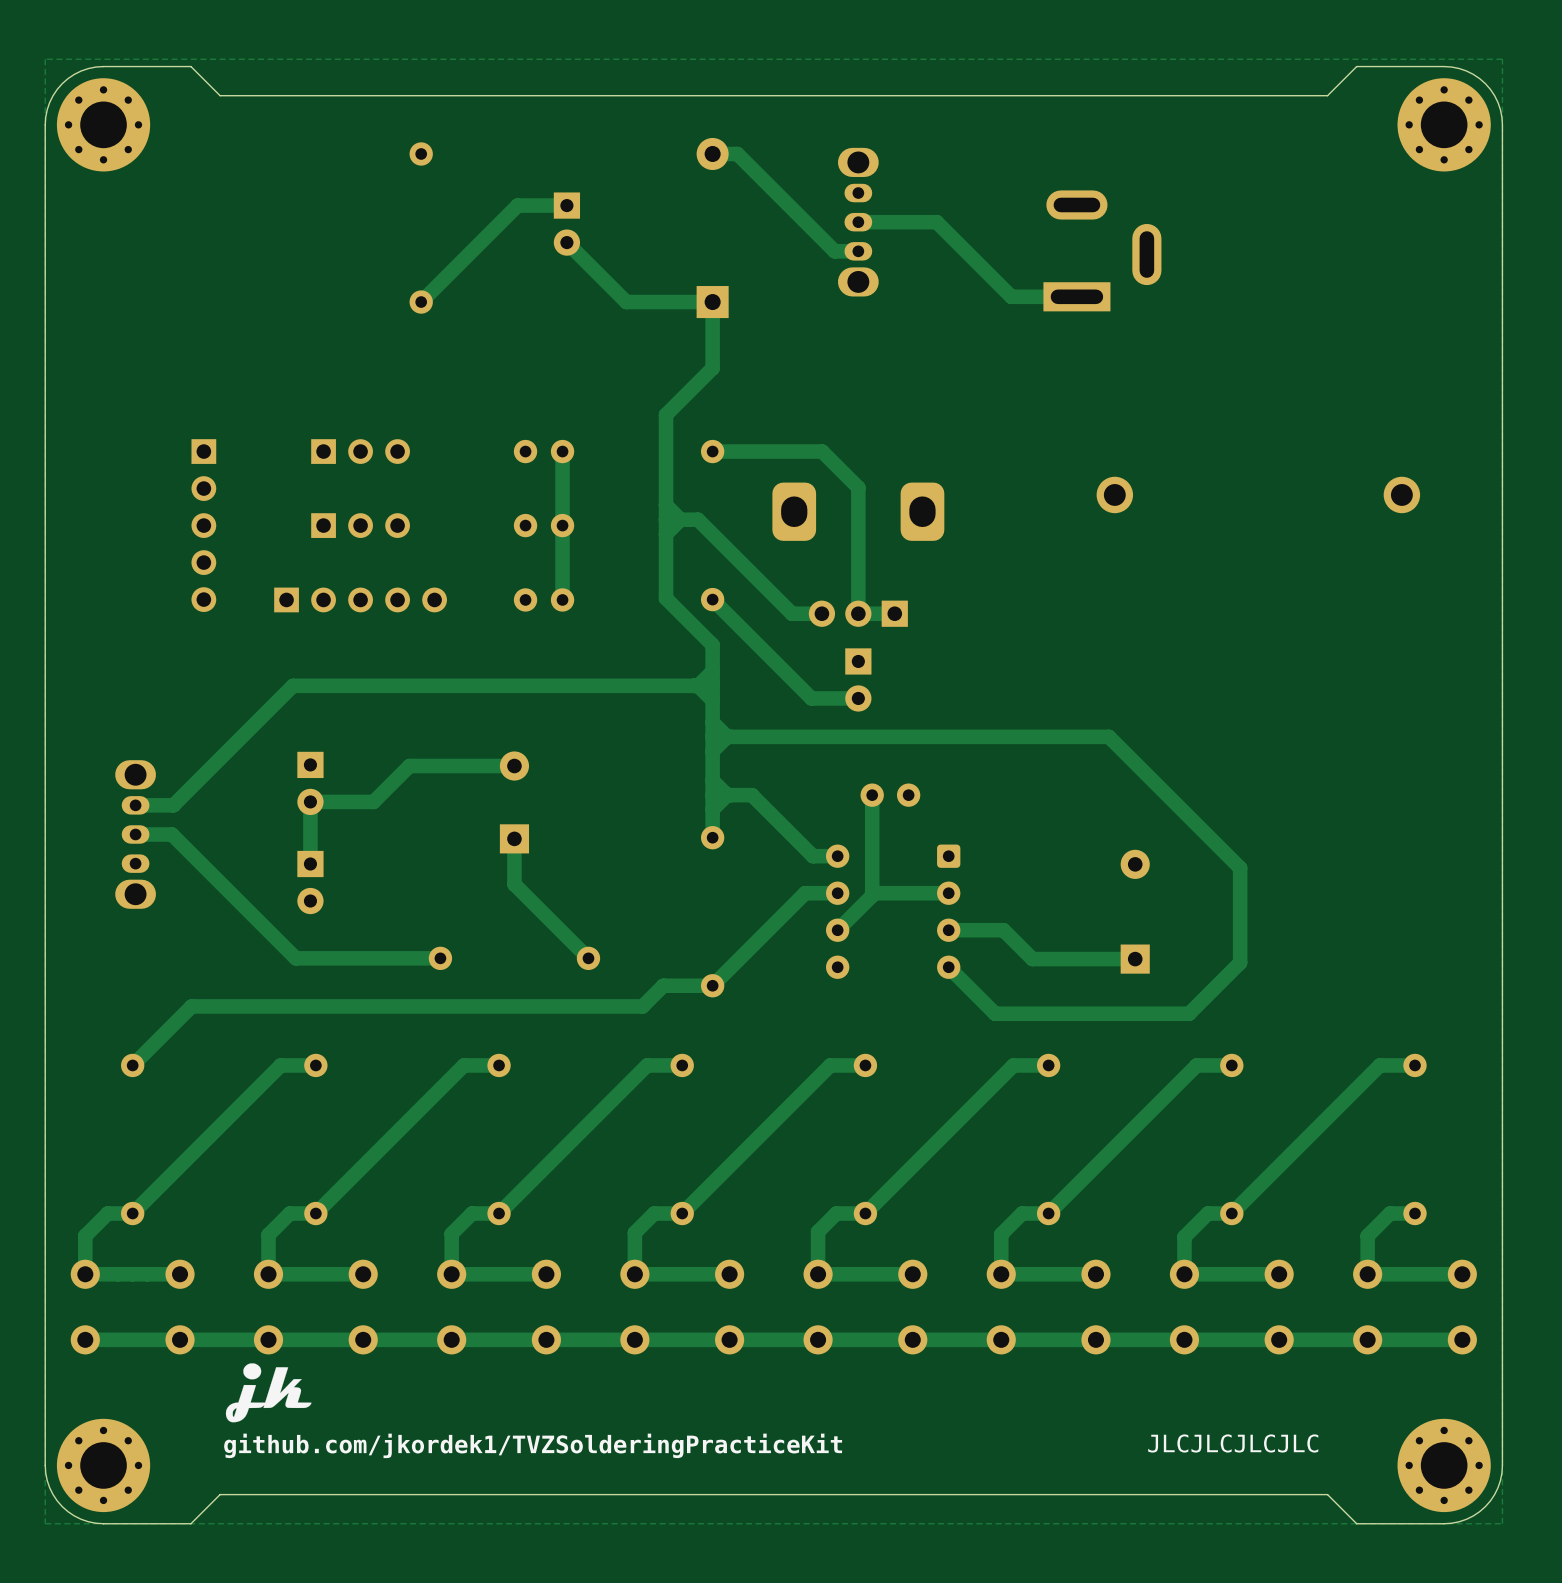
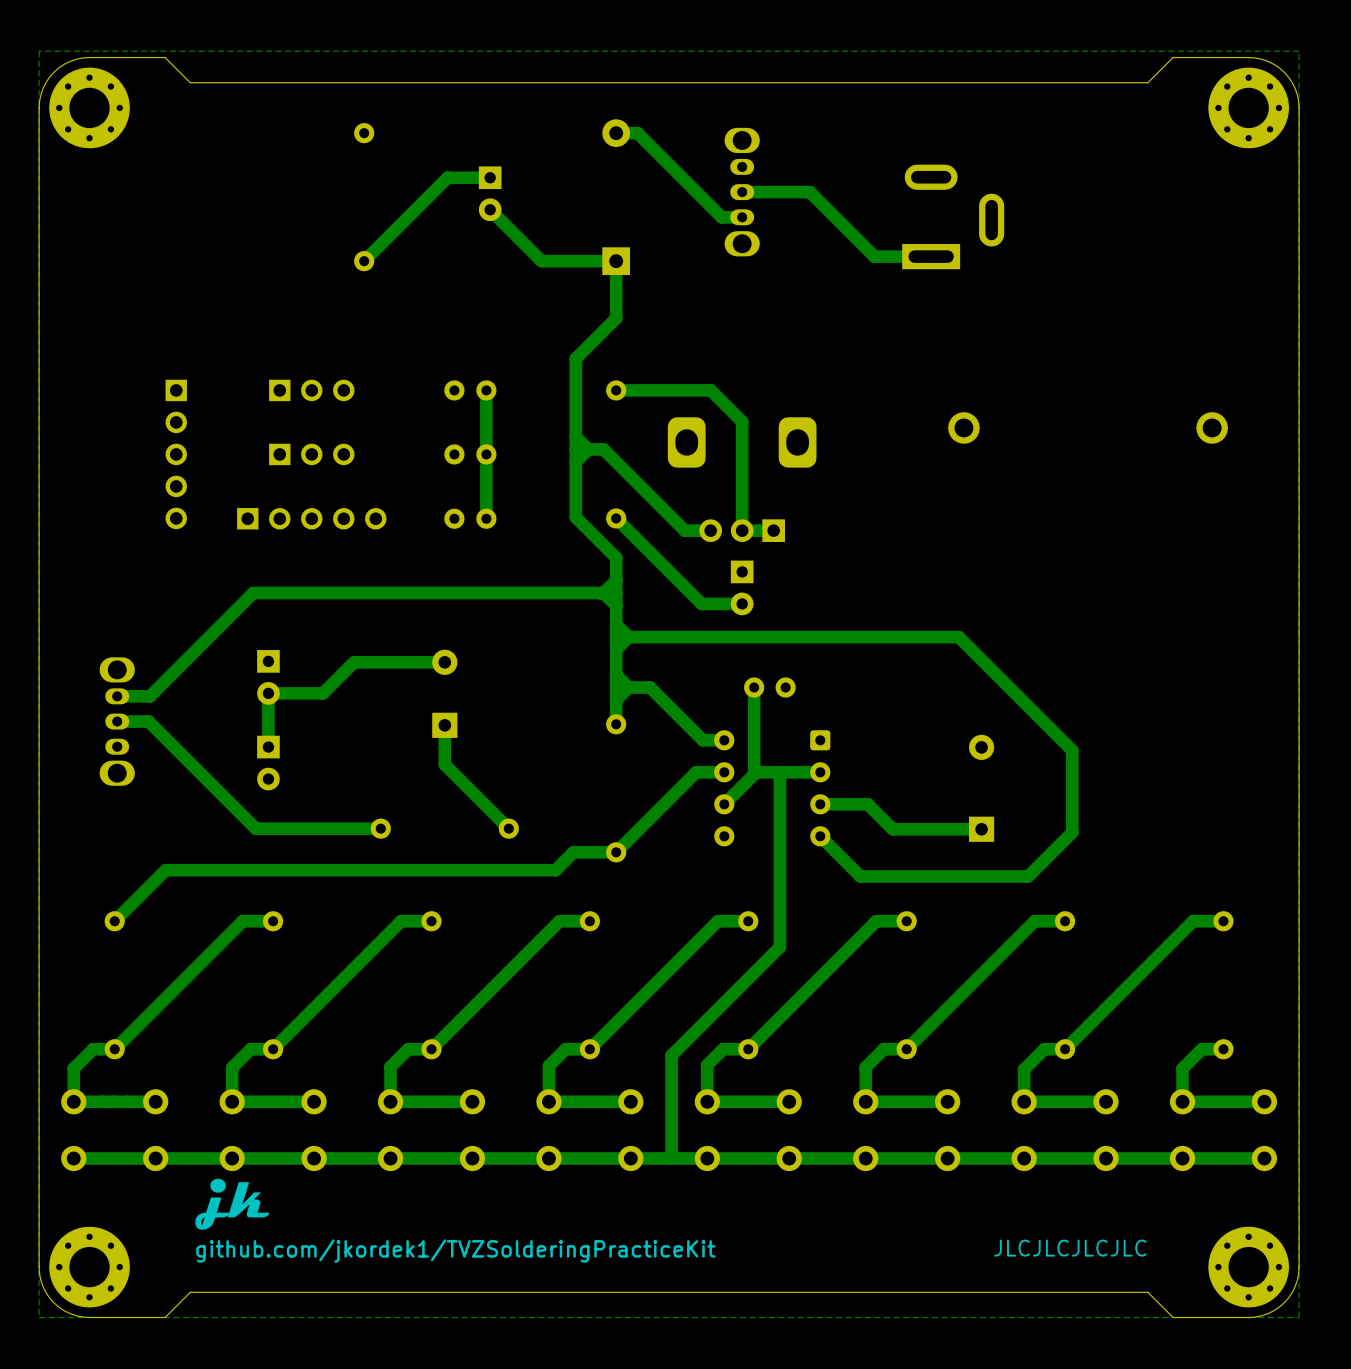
track: none -> (779, 772) (779, 947) (671, 1055) (671, 1158)

